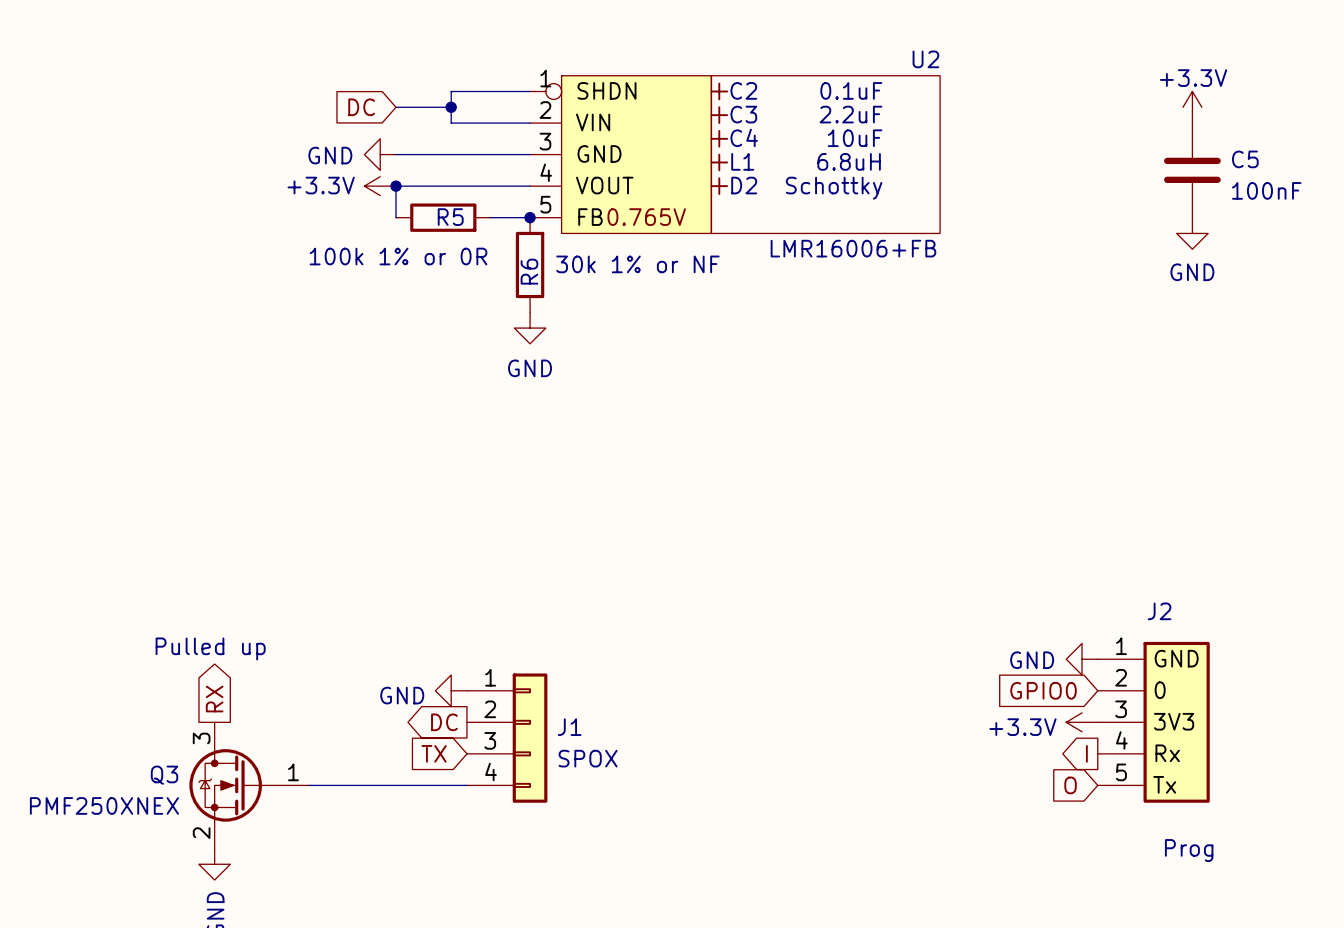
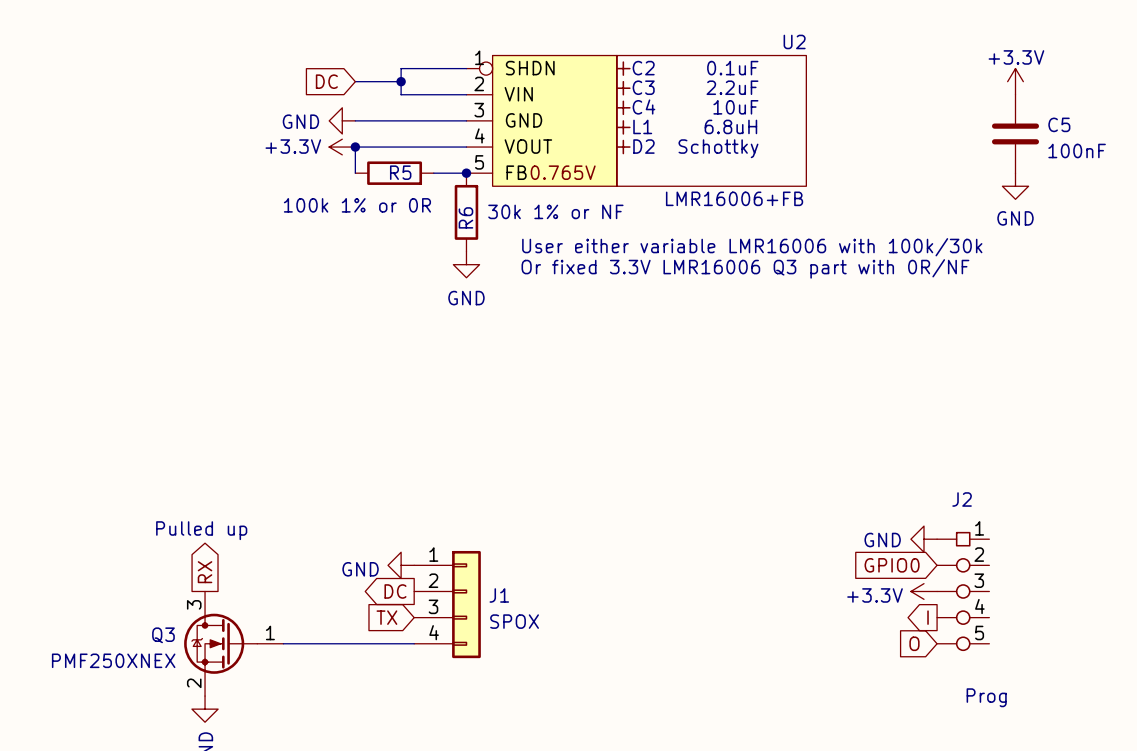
text: none -> User either variable LMR16006 with 100k/30k (752, 247)
text: none -> Or fixed 3.3V LMR16006 Q3 part with 0R/NF (745, 268)
J2 symbol: [1097, 641, 1210, 803] -> [937, 531, 990, 652]

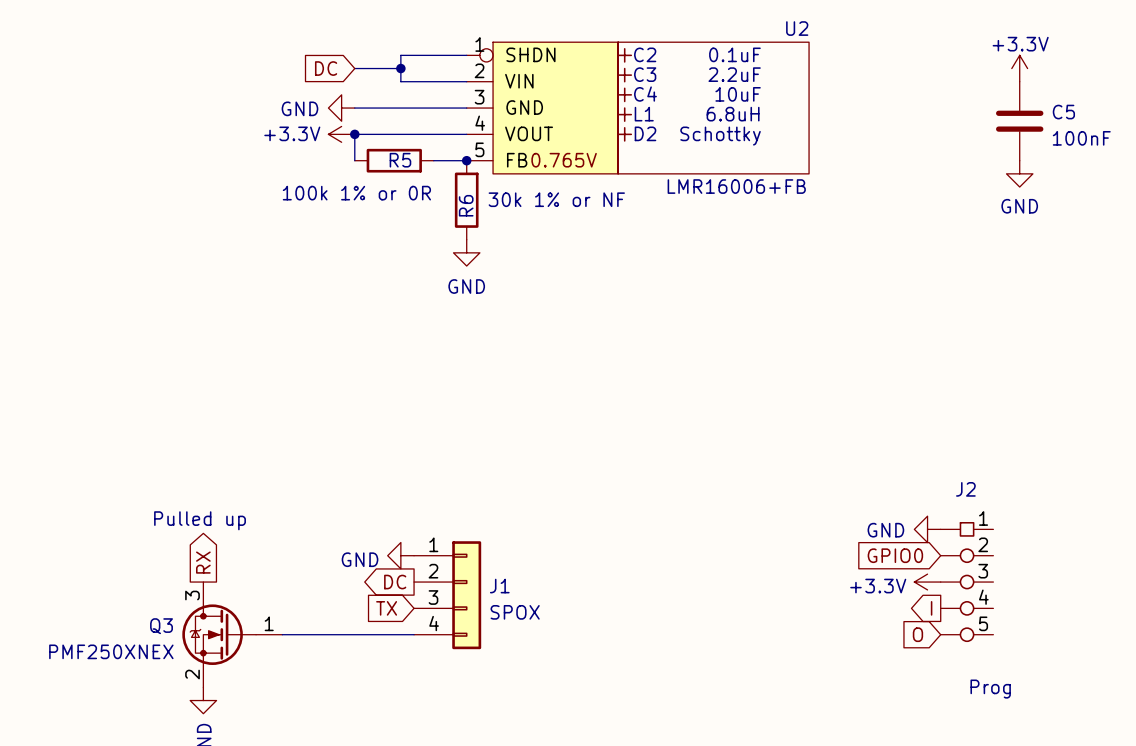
text: User either variable LMR16006 with 100k/30k (752, 247) -> none
text: Or fixed 3.3V LMR16006 Q3 part with 0R/NF (745, 268) -> none

